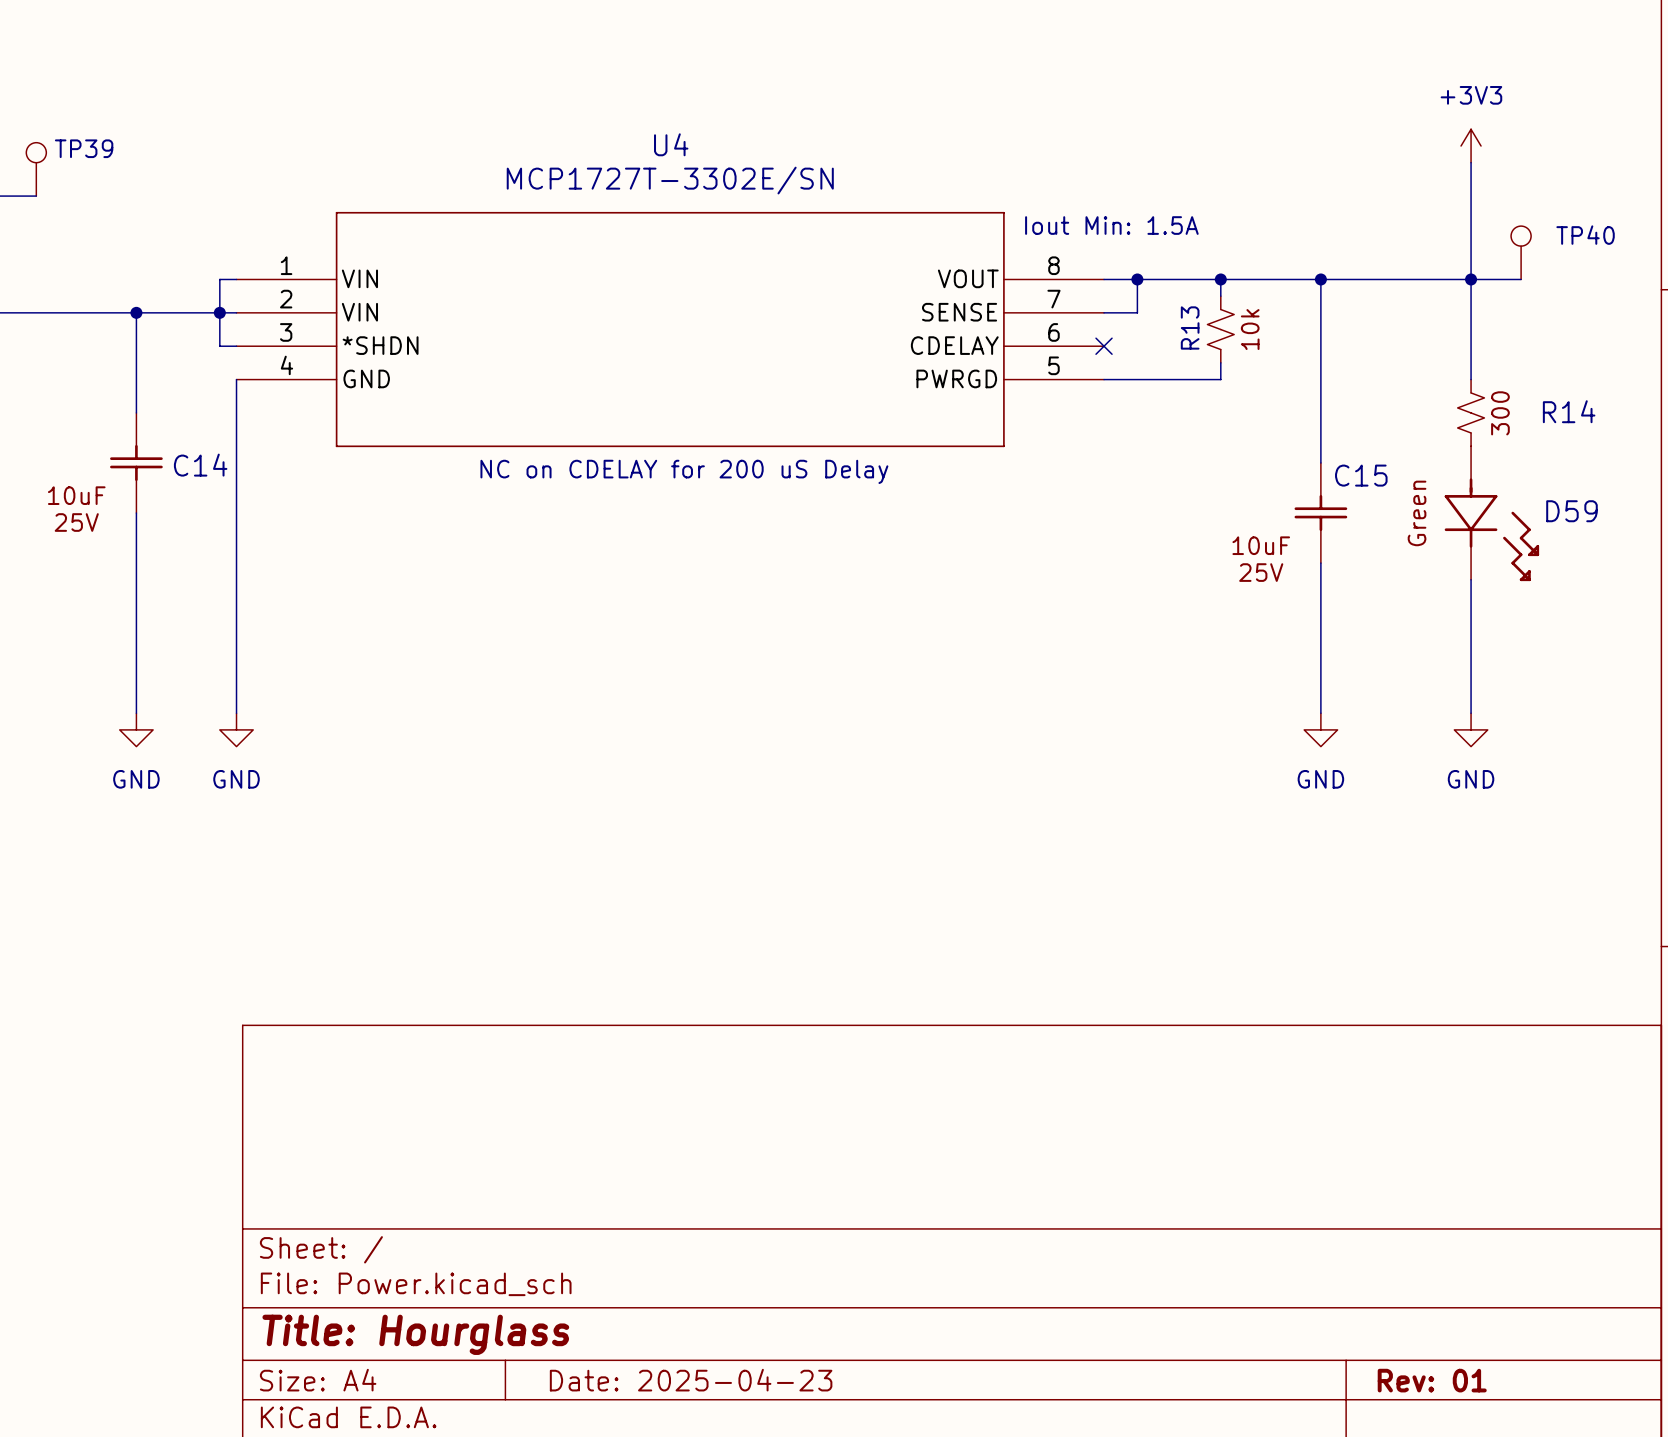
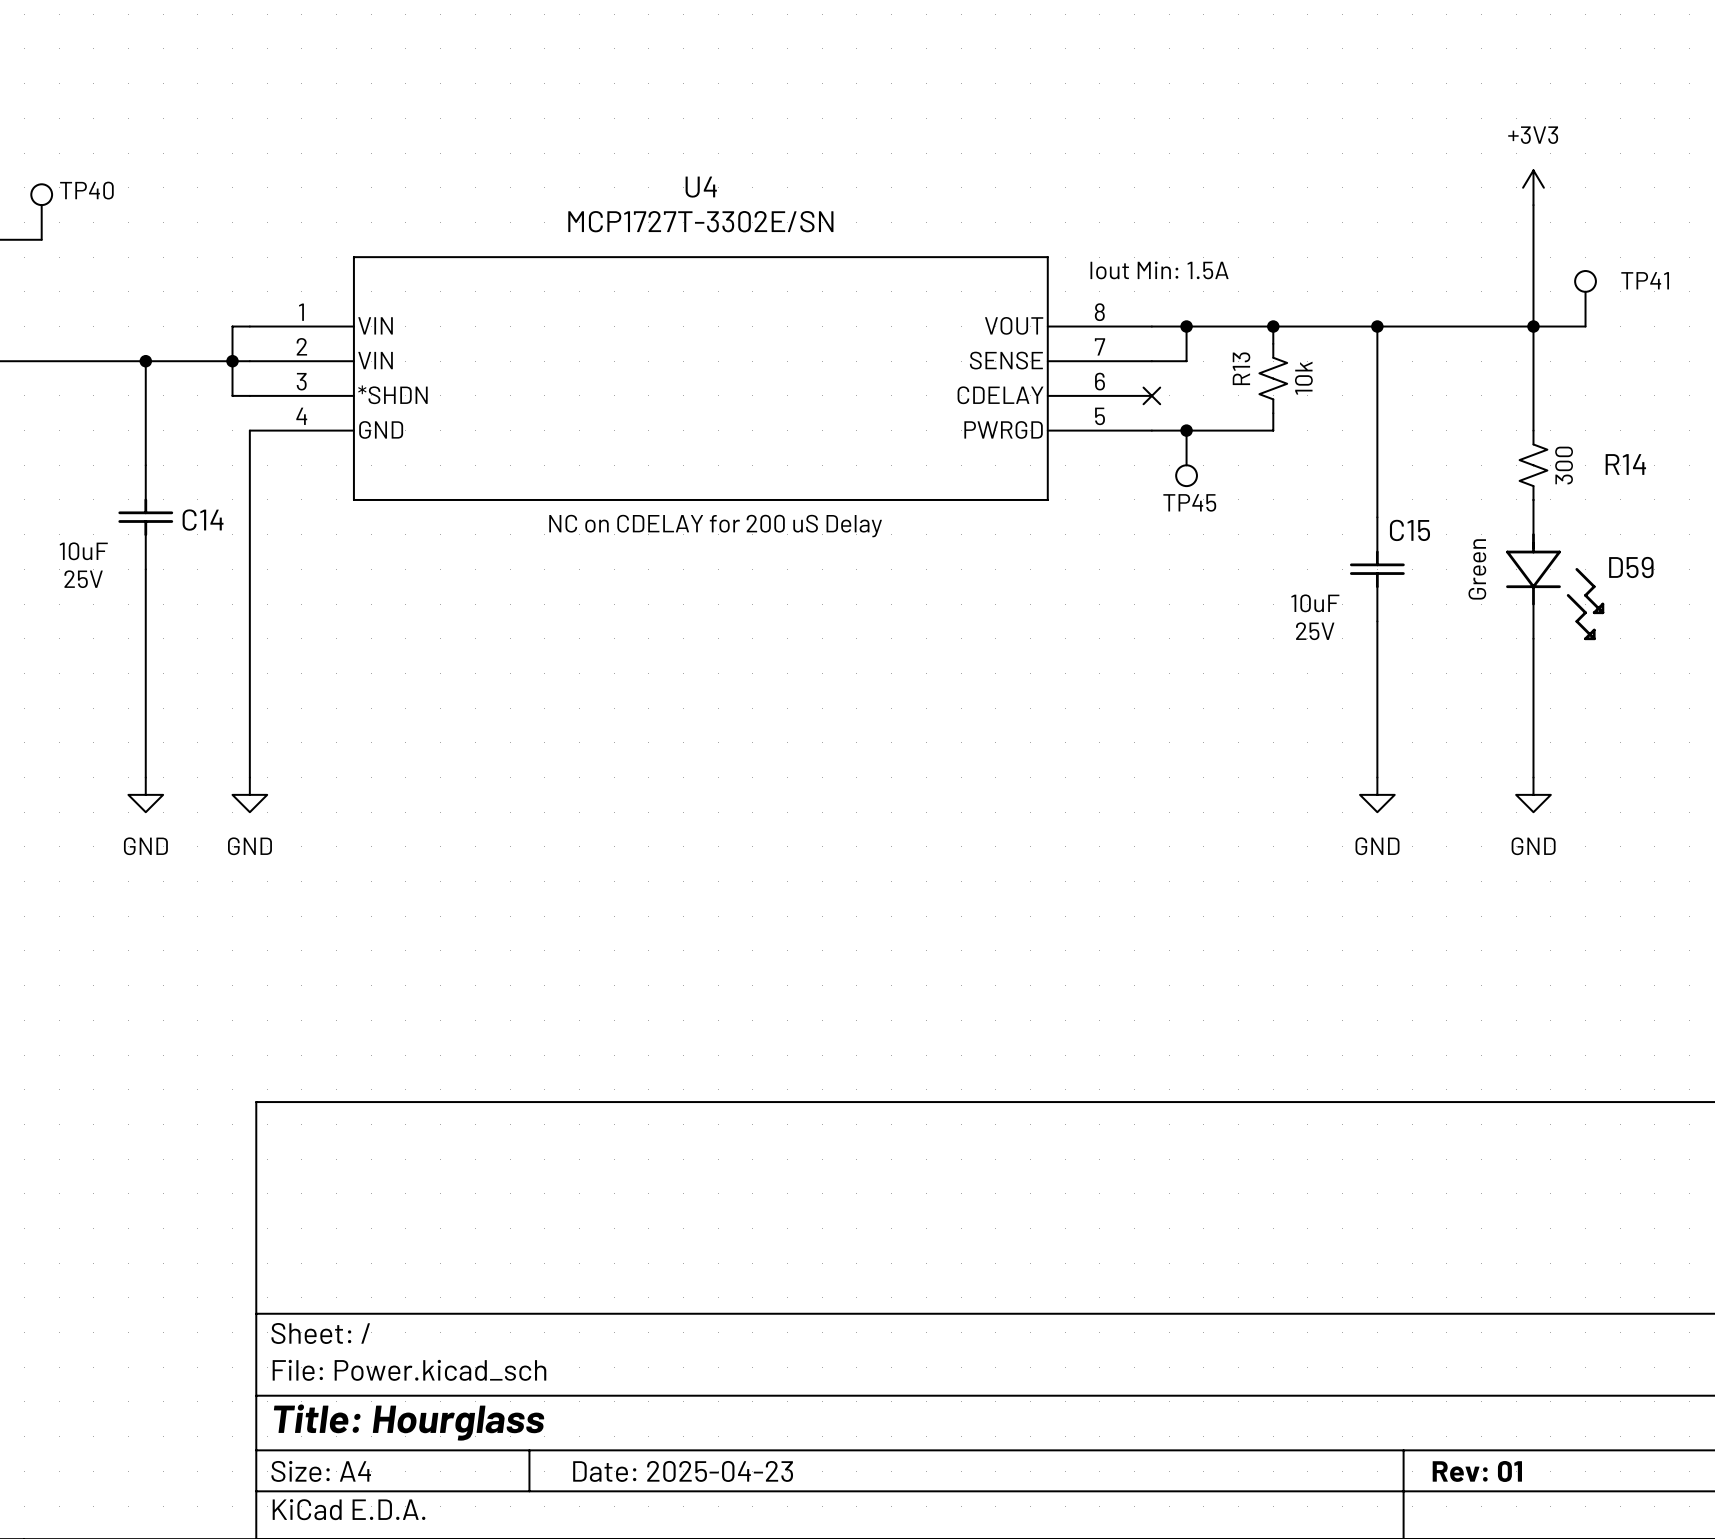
TP39 name: TP39 (84, 148) -> TP40 (86, 190)
TP40 name: TP40 (1585, 235) -> TP41 (1645, 280)
junction: none -> (1186, 430)
TP45: none -> (1186, 458)

